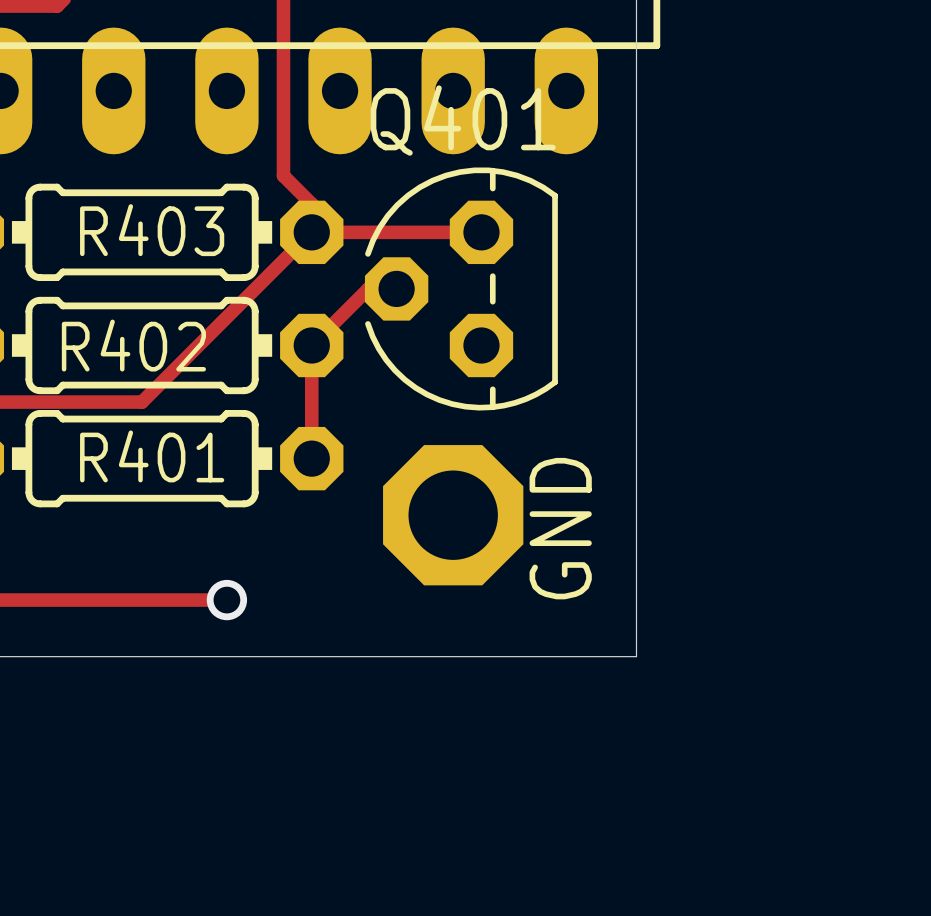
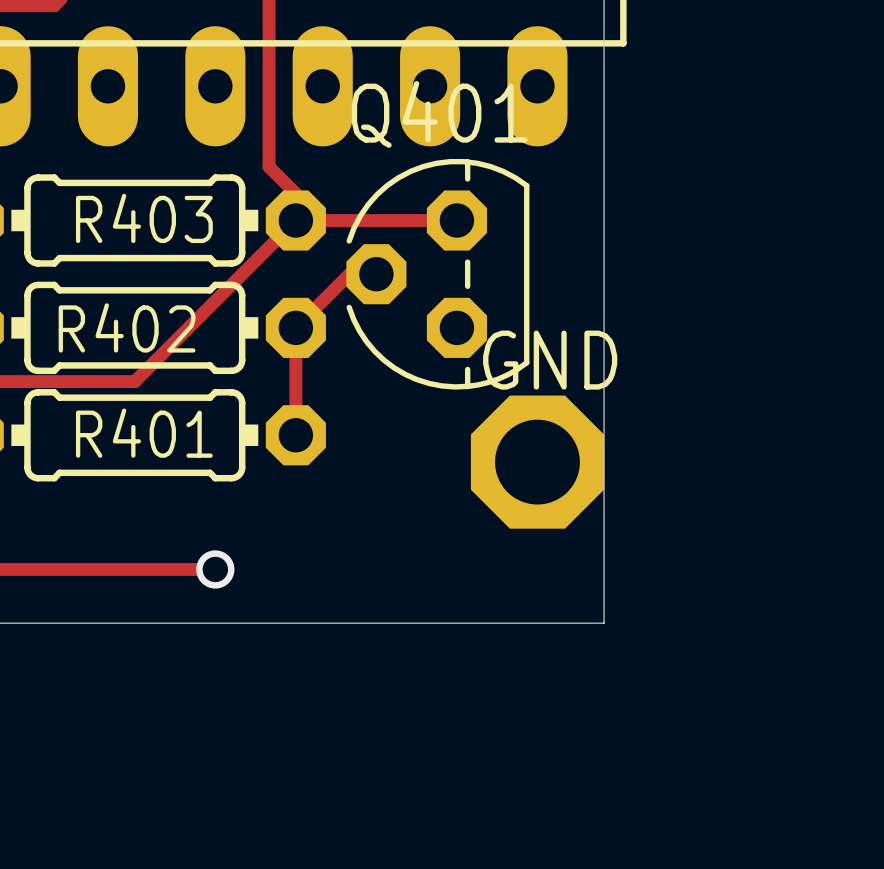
GND position: (453, 515) -> (537, 462)
GND name rotation: 0° (560, 528) -> 90° clockwise (550, 360)

